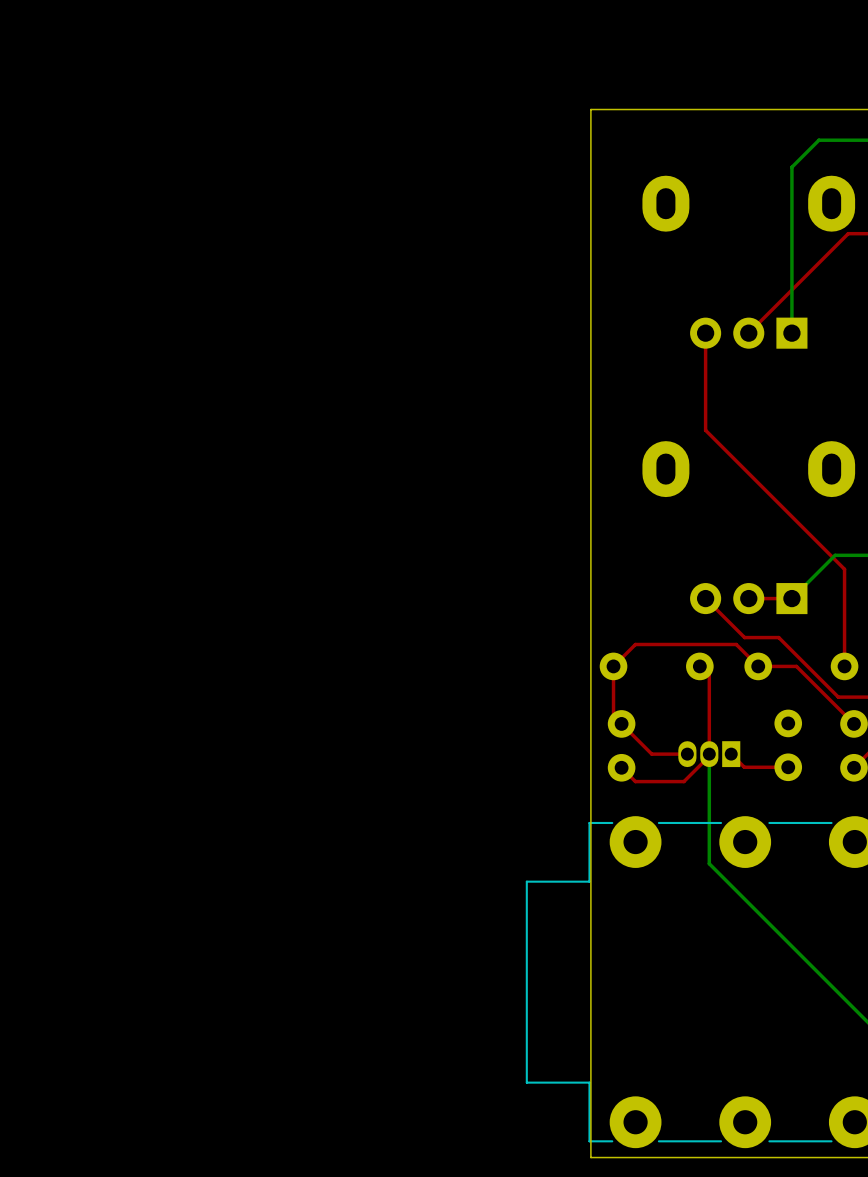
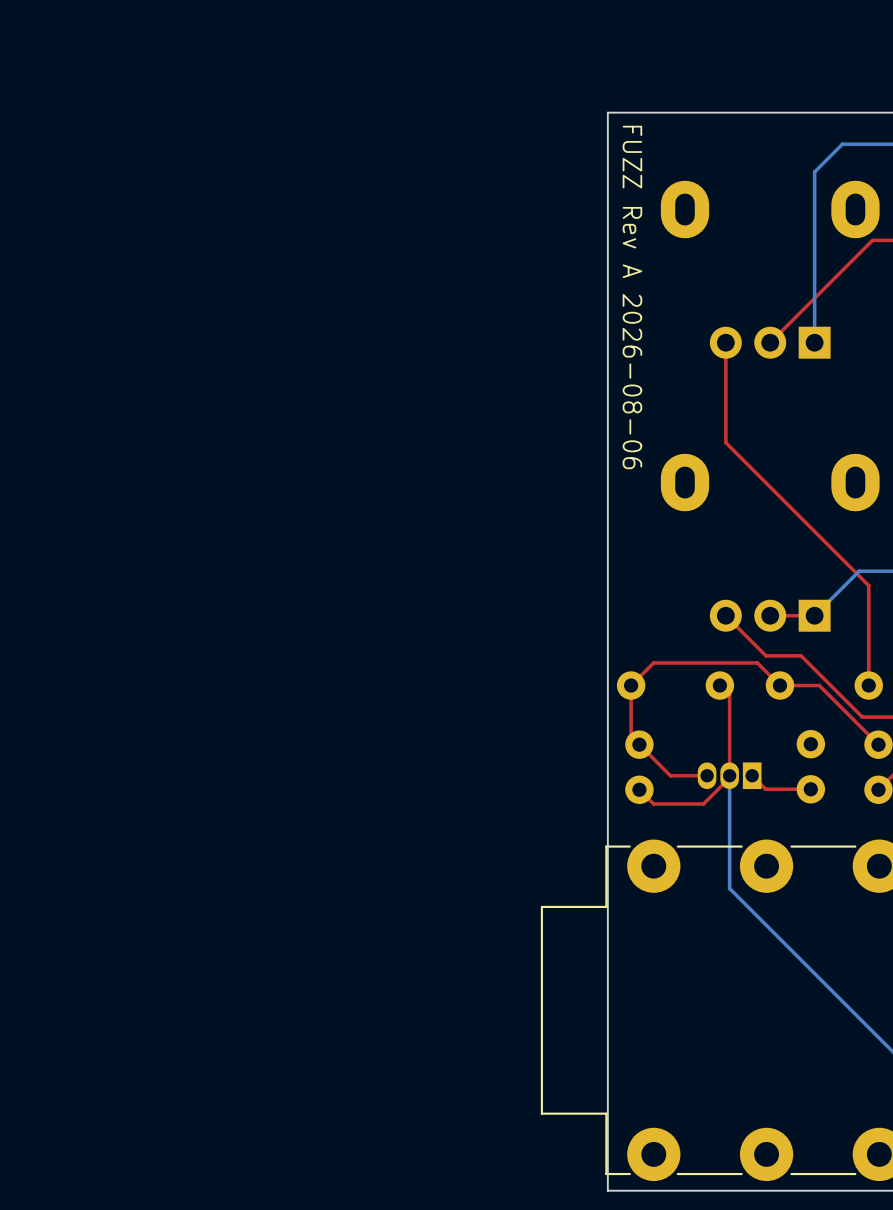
text: none -> FUZZ Rev A 2026-08-06 (632, 297)

